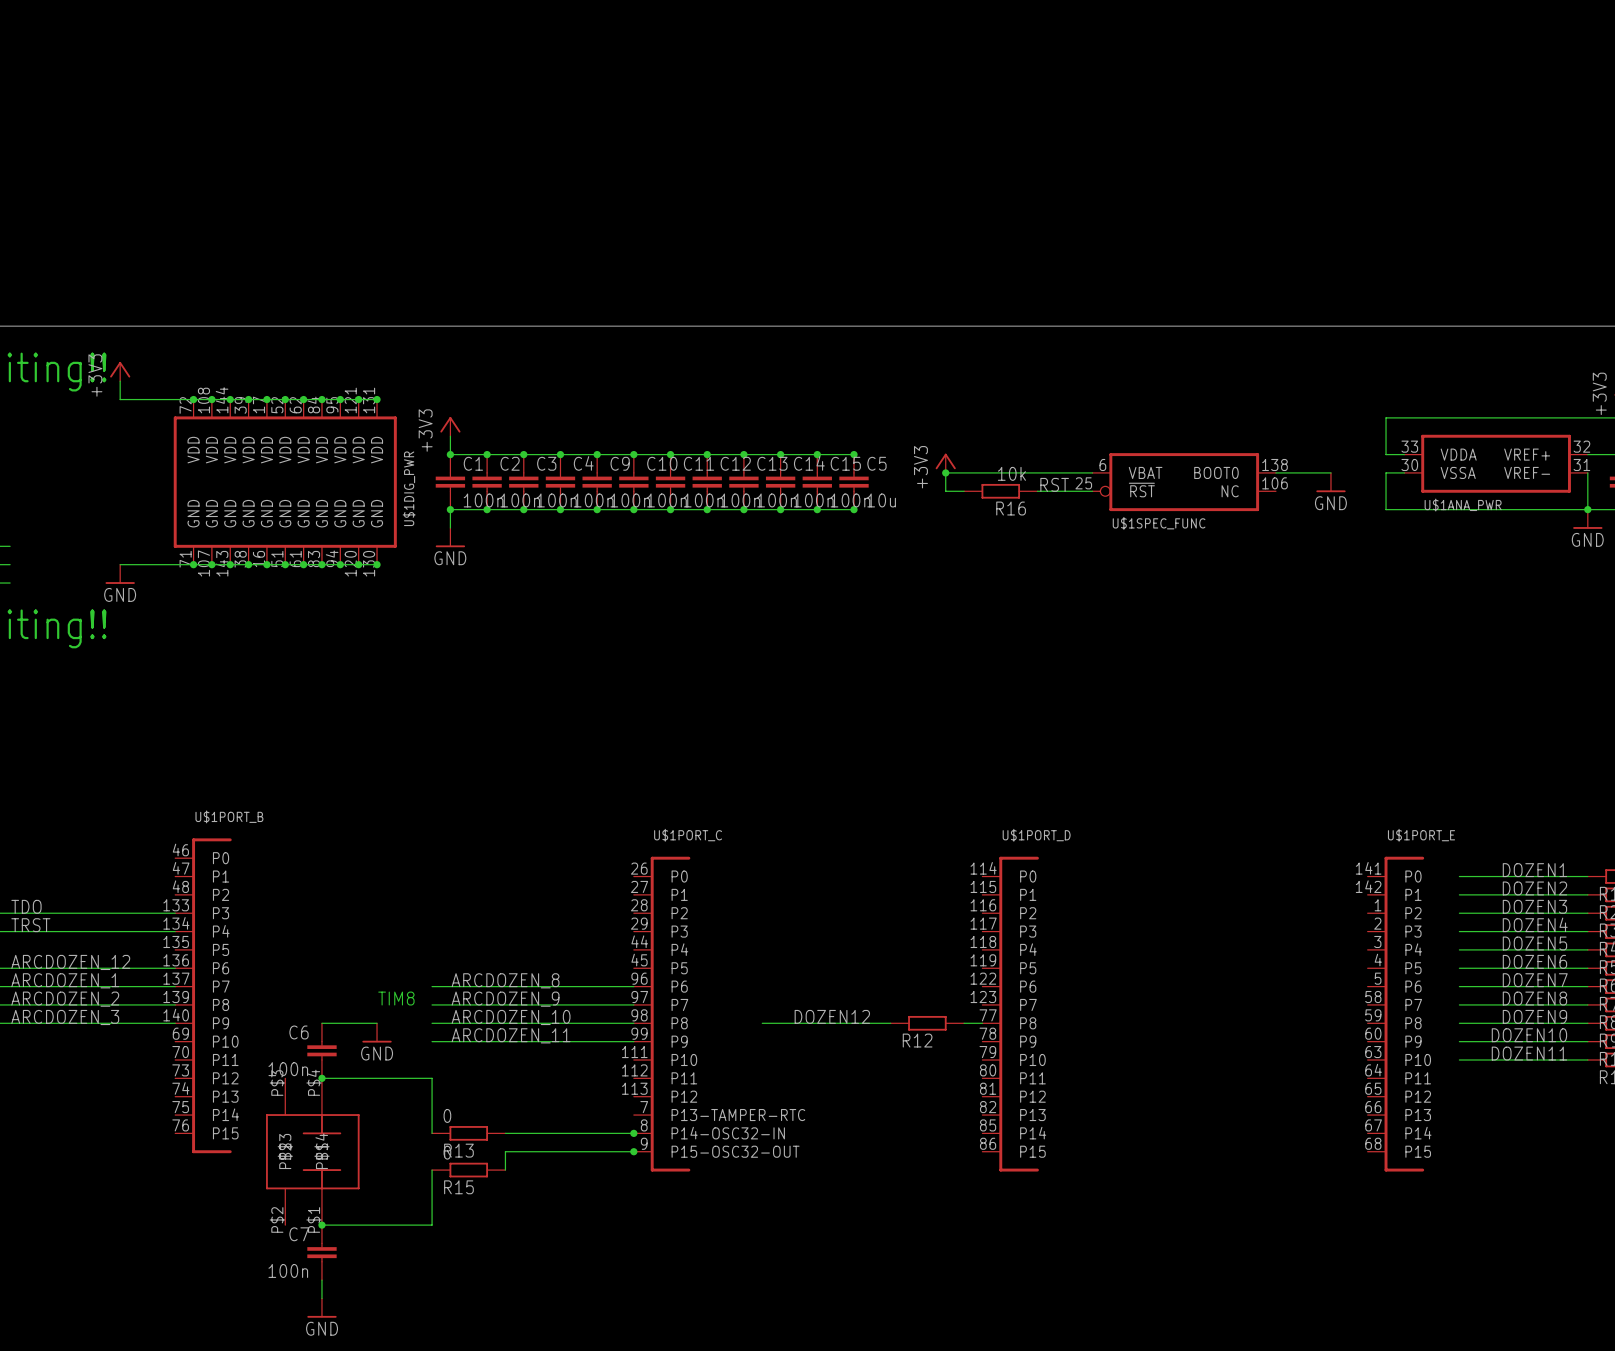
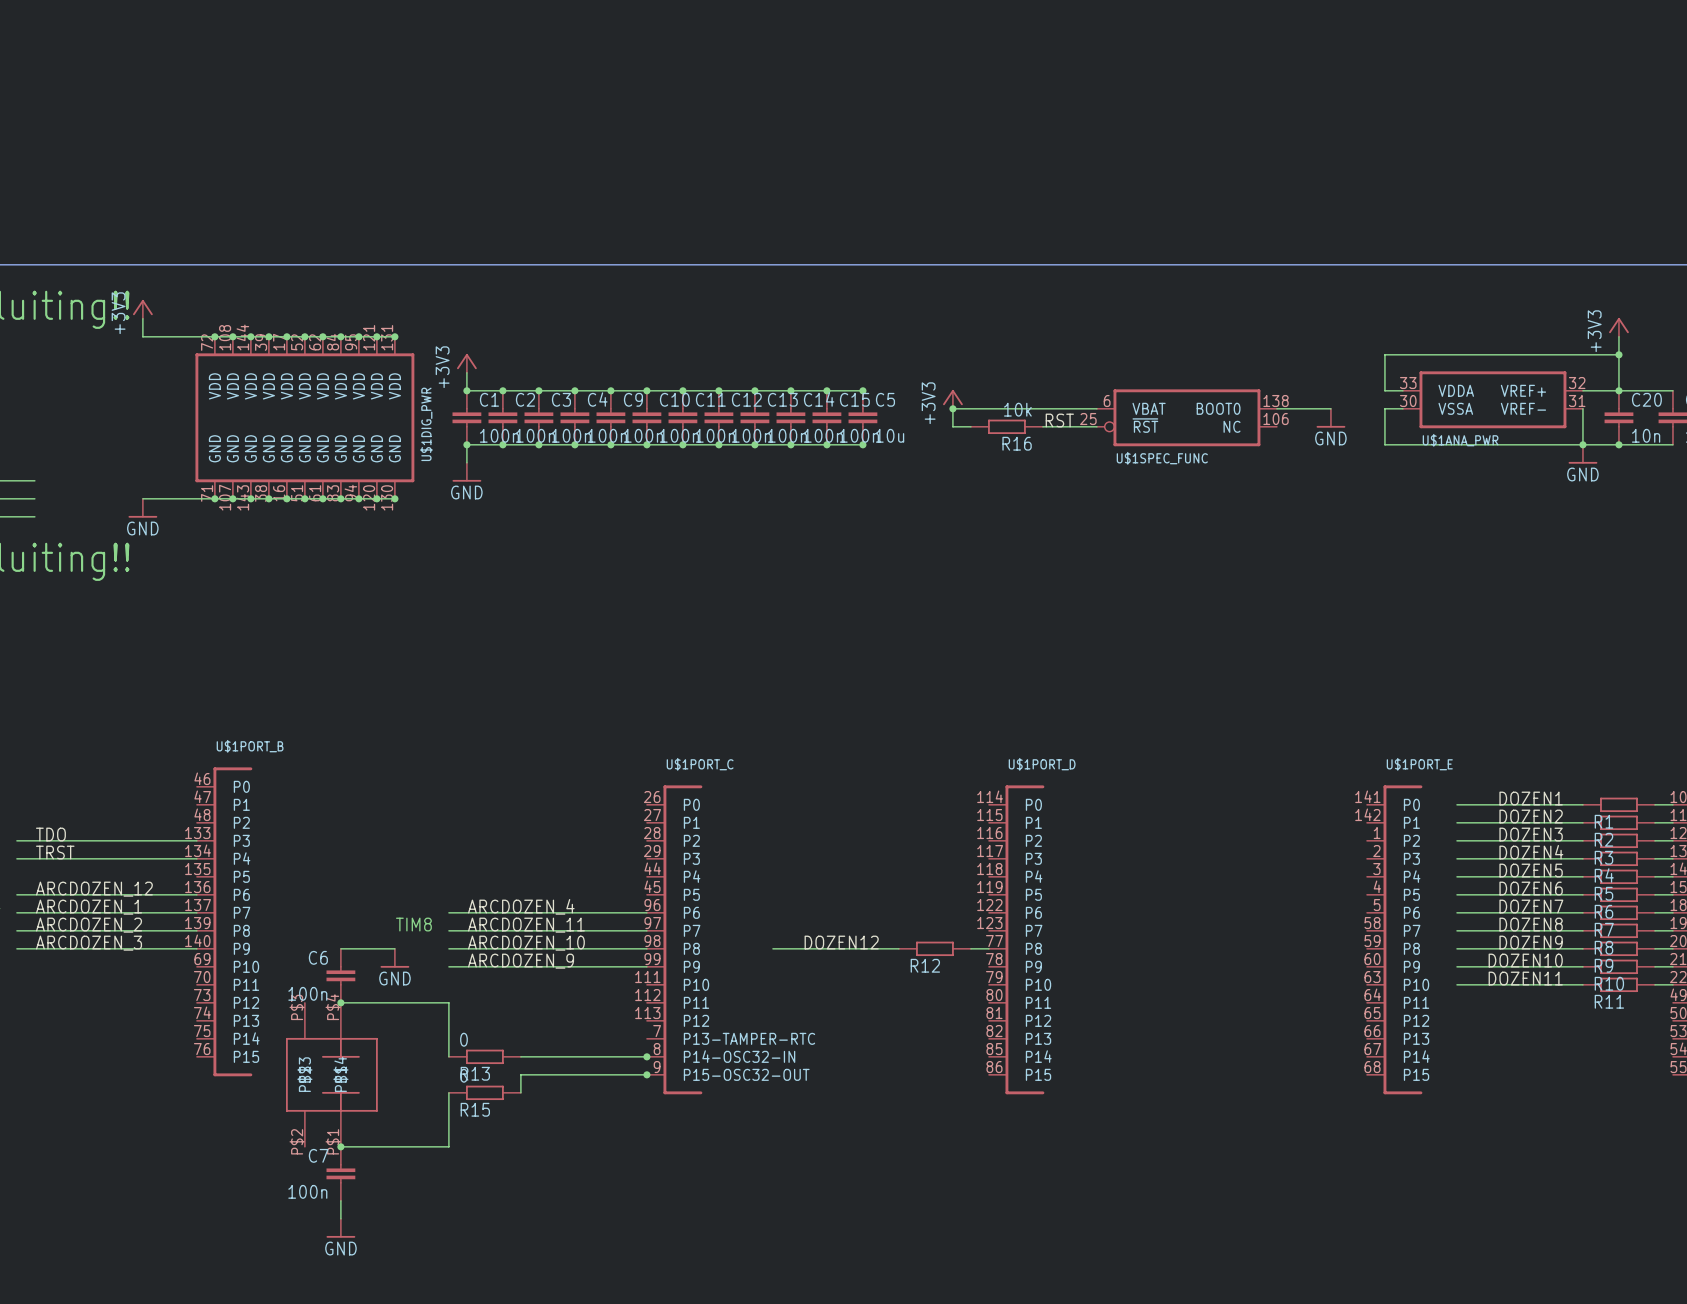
label: ARCDOZEN_8 (505, 980) -> ARCDOZEN_4 (521, 906)
label: ARCDOZEN_9 (505, 999) -> ARCDOZEN_11 (526, 925)
label: ARCDOZEN_11 (511, 1035) -> ARCDOZEN_9 (521, 961)

